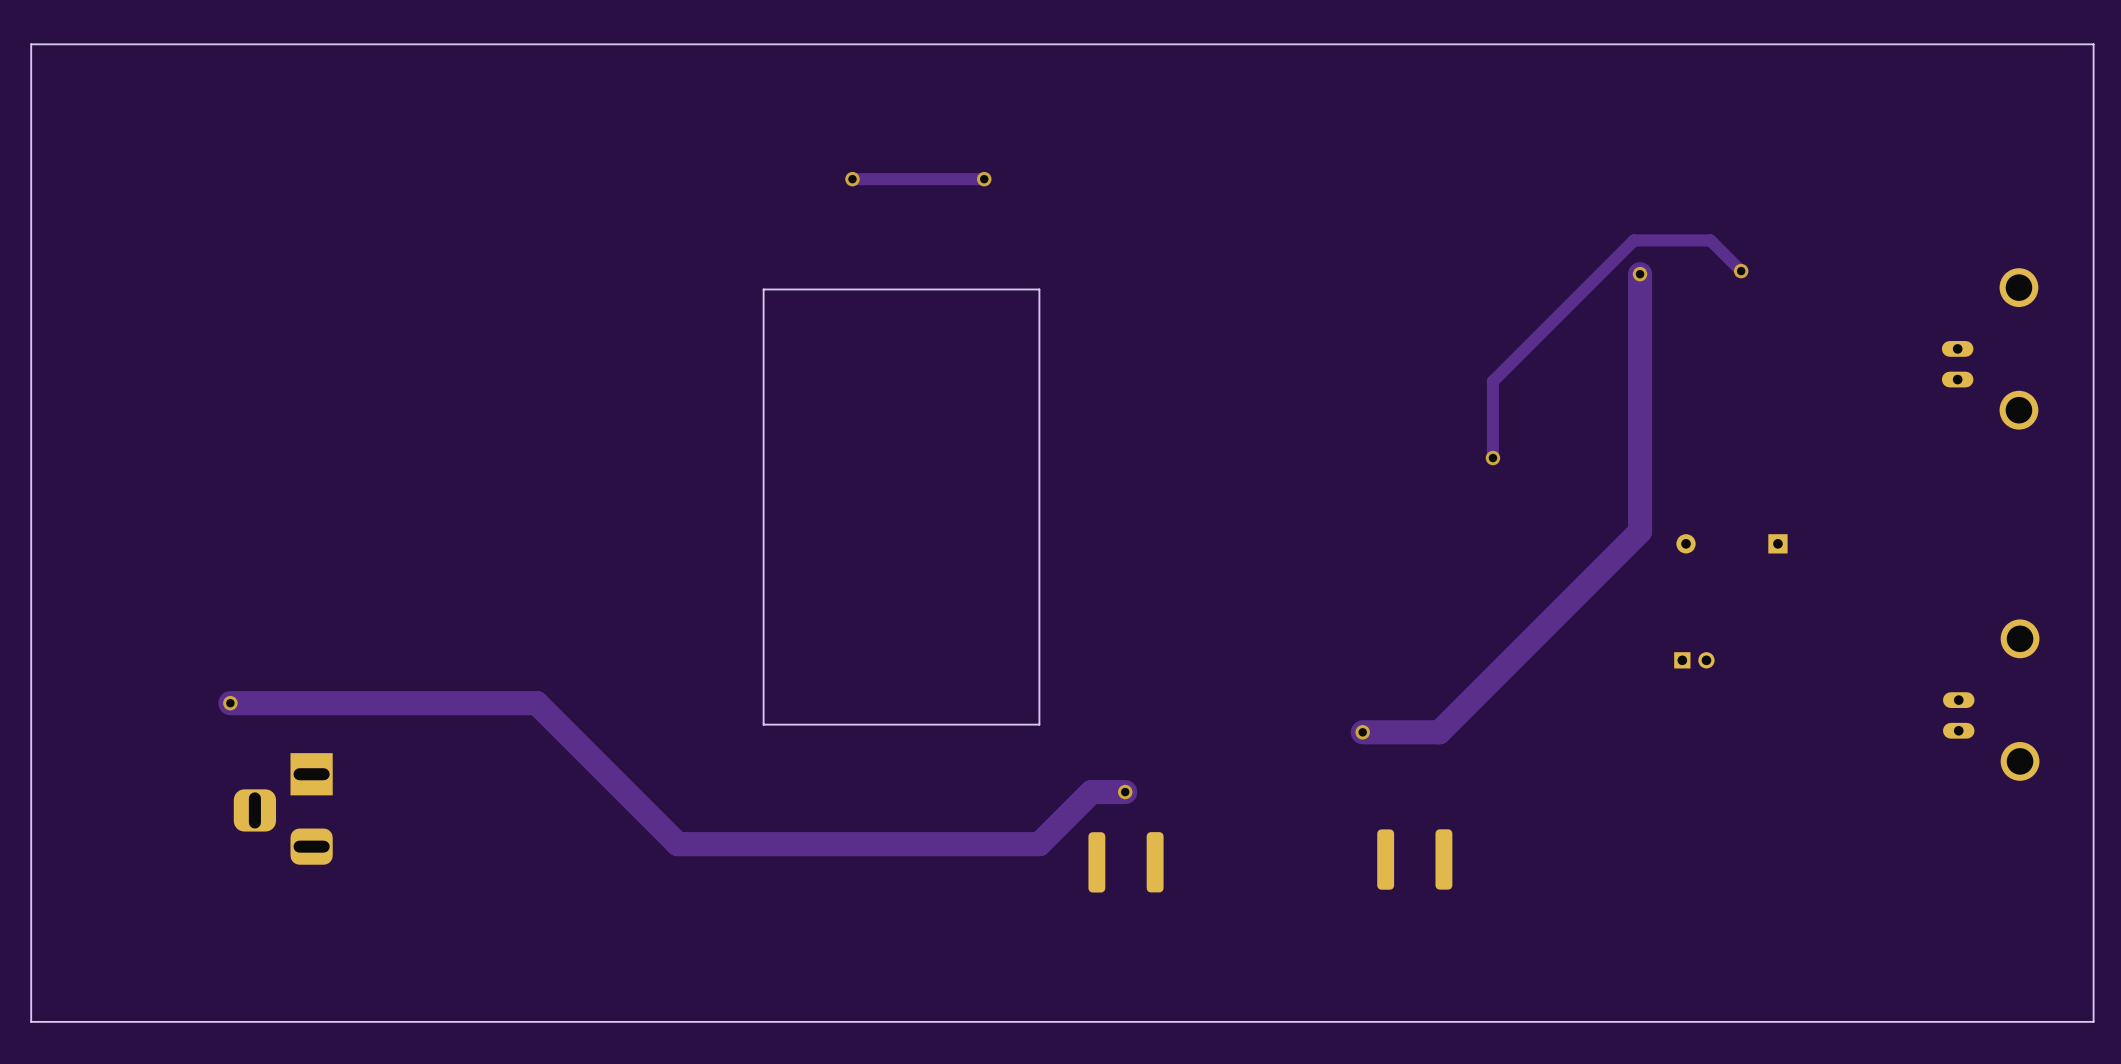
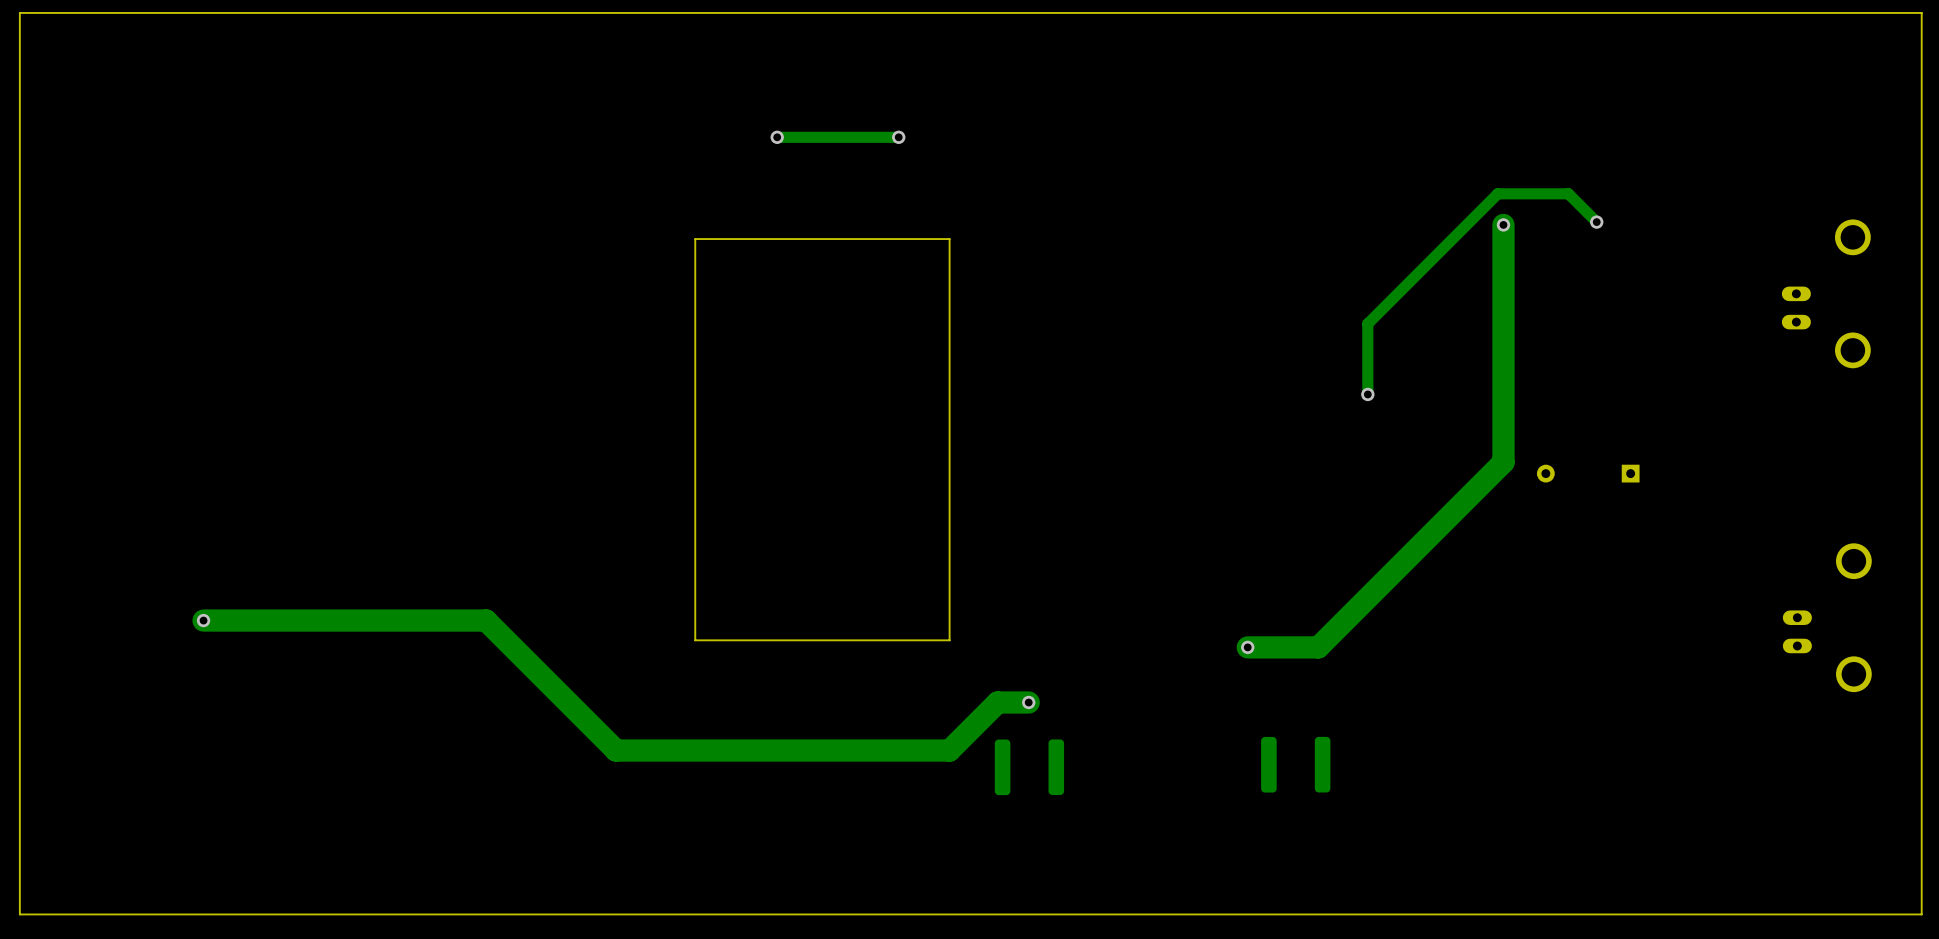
part: (1694, 660) -> none
part: (283, 808) -> none

